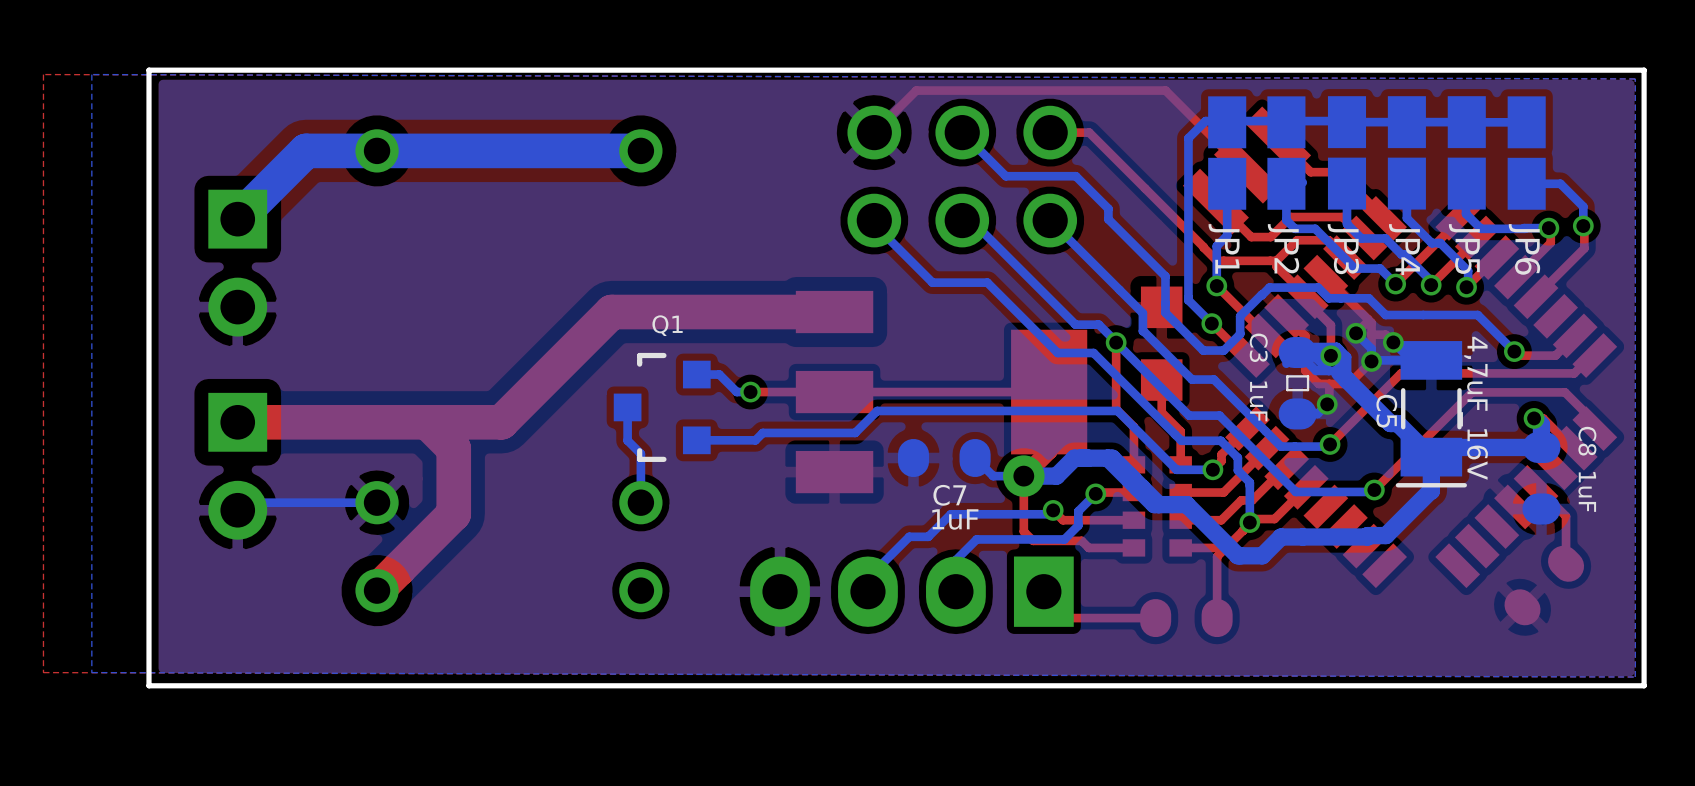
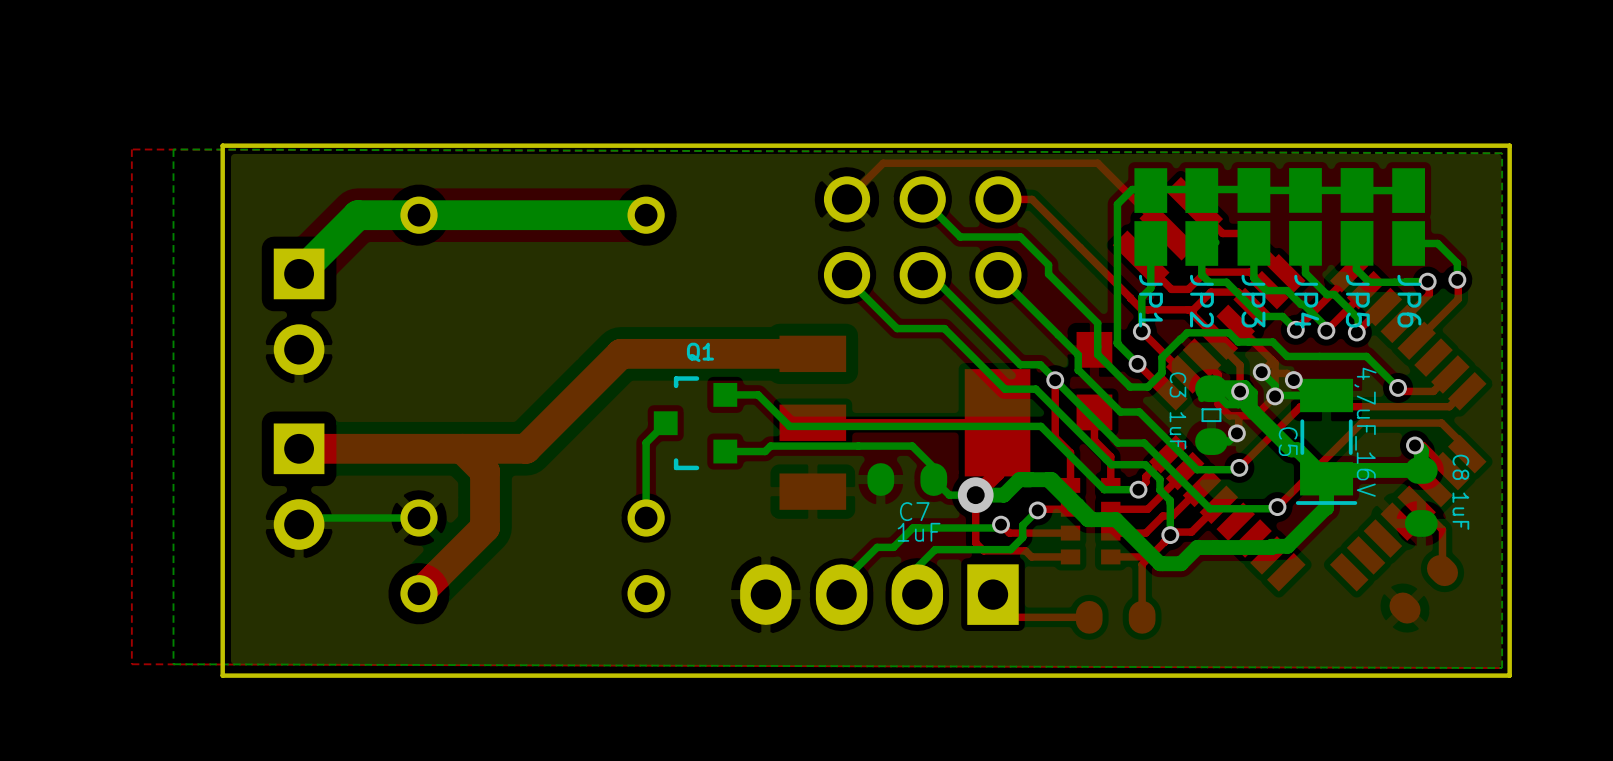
bottom track: (696, 374) (719, 374) (736, 392) (750, 392) -> none
via: (750, 392) -> none
top track: (805, 392) (750, 392) -> none
bottom track: (627, 407) (627, 440) (640, 453) -> (665, 423) (646, 442) (646, 475)
Q1 position: (662, 407) -> (695, 423)
bottom track: none -> (725, 451) (765, 451) (770, 446) (912, 446) (933, 467)
bottom track: (696, 440) (755, 440) (762, 432) (855, 432) (877, 410) (1117, 410) (1176, 469) -> (725, 394) (758, 394) (789, 426) (1040, 426) (1104, 489) (1107, 489)

